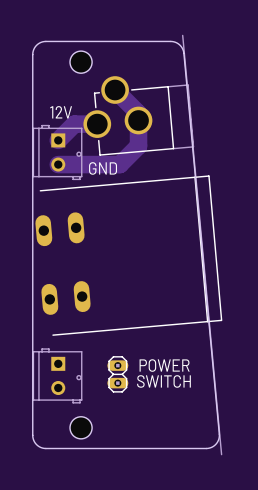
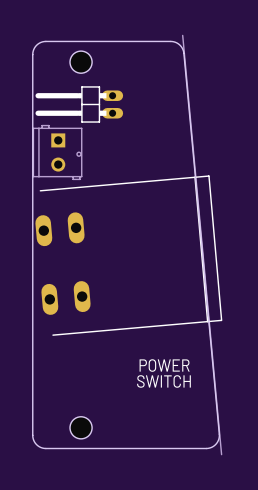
track: (115, 90) (138, 113) (138, 146) (119, 164) (58, 164) -> none
part: none -> (79, 104)
text: 12V (61, 112) -> none
part: (138, 115) -> none
track: (97, 124) (74, 124) (58, 140) -> none
text: GND (103, 168) -> none
part: (117, 374) -> none
part: (57, 375) -> none

